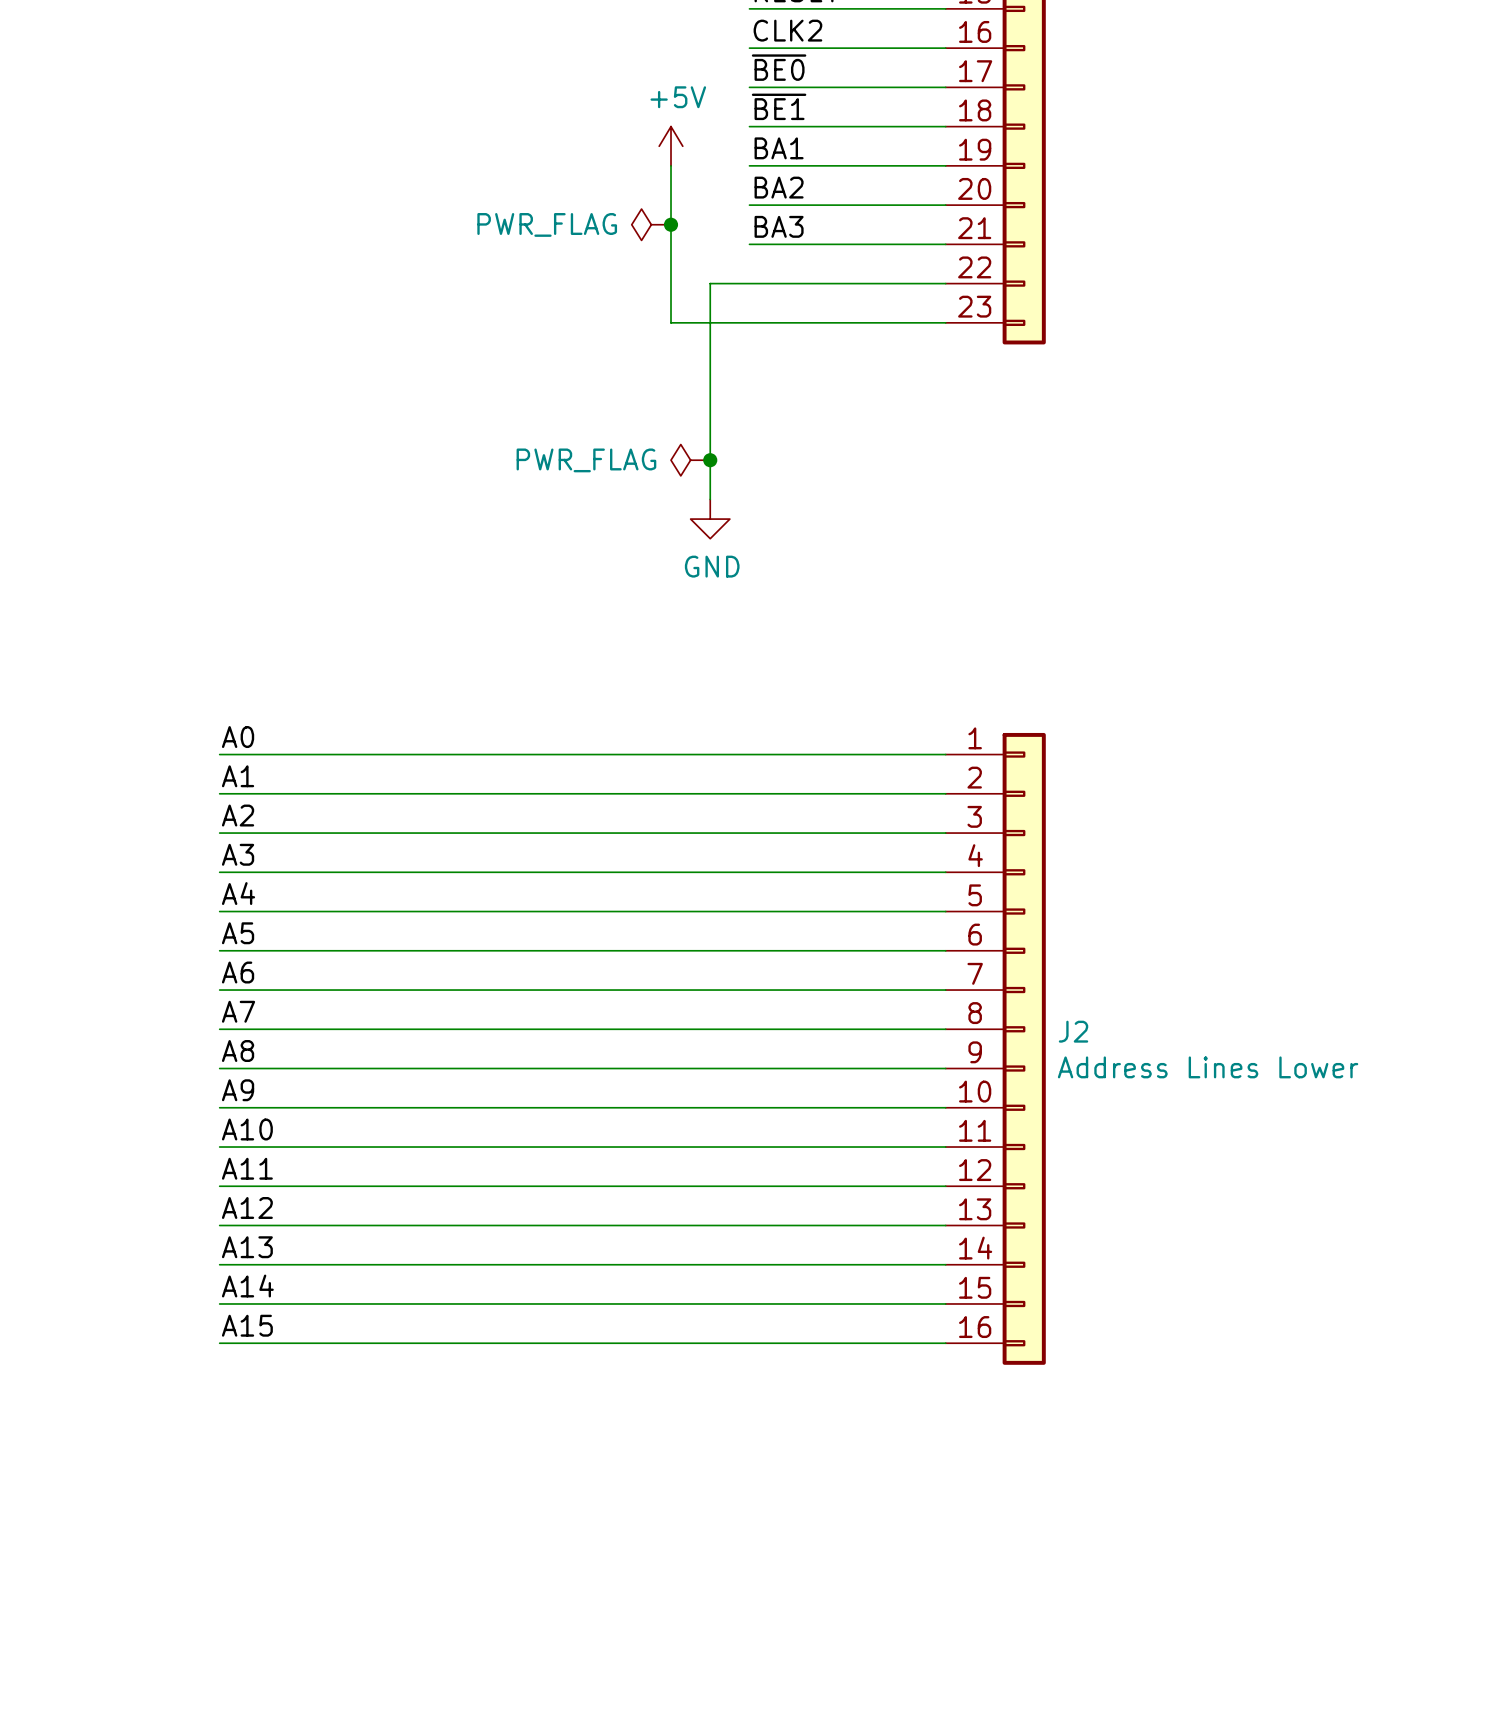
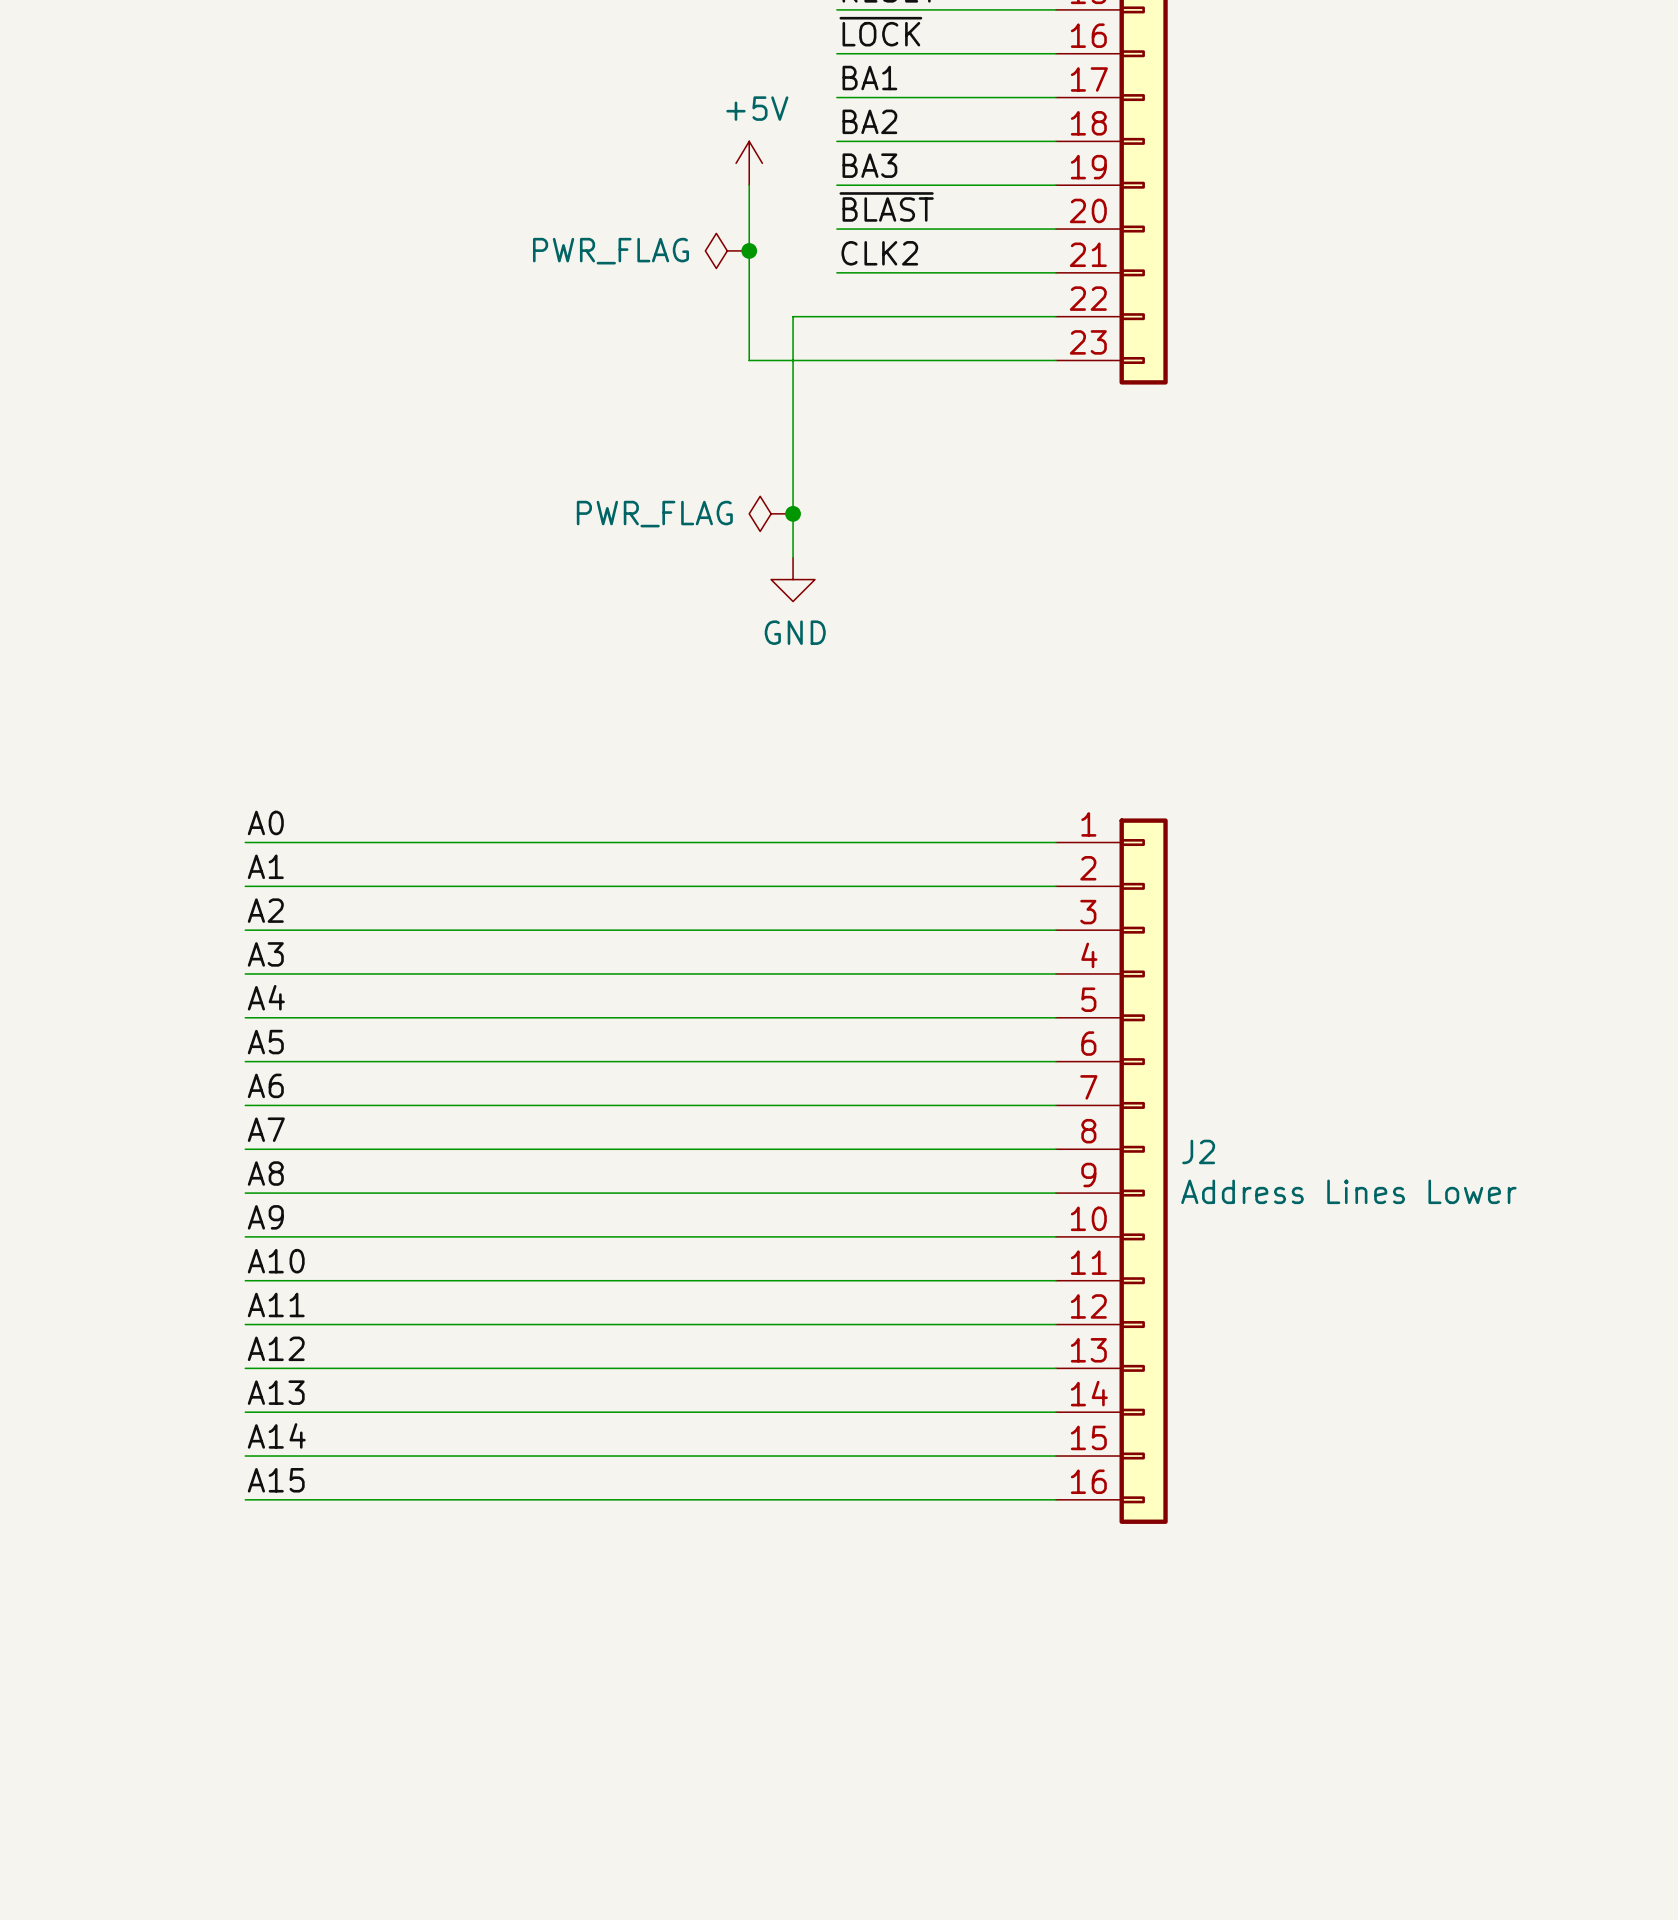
label: CLK2 (787, 30) -> ~{LOCK} (880, 31)
label: ~{BE0} (779, 67) -> BA1 (869, 78)
label: ~{BE1} (779, 106) -> BA2 (869, 121)
label: BA1 (779, 148) -> BA3 (869, 165)
label: BA2 (779, 187) -> ~{BLAST} (886, 206)
label: BA3 (779, 226) -> CLK2 (879, 253)

